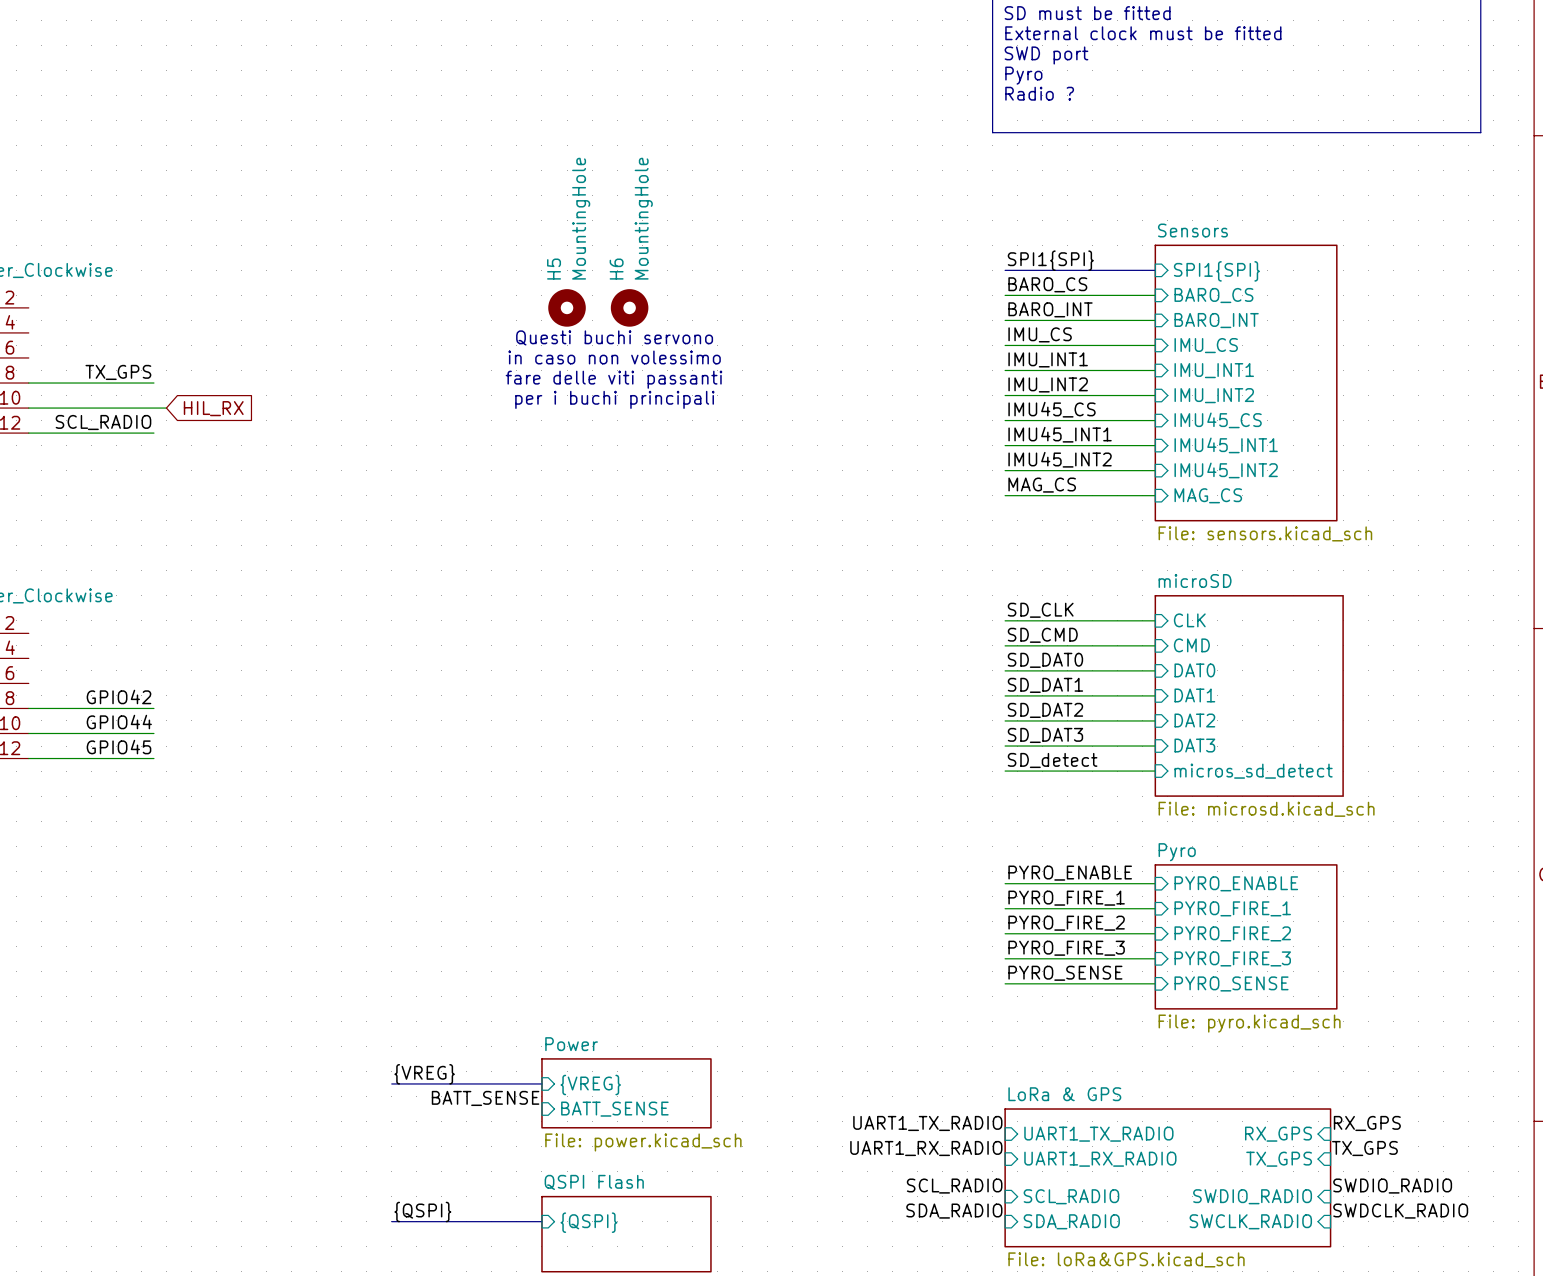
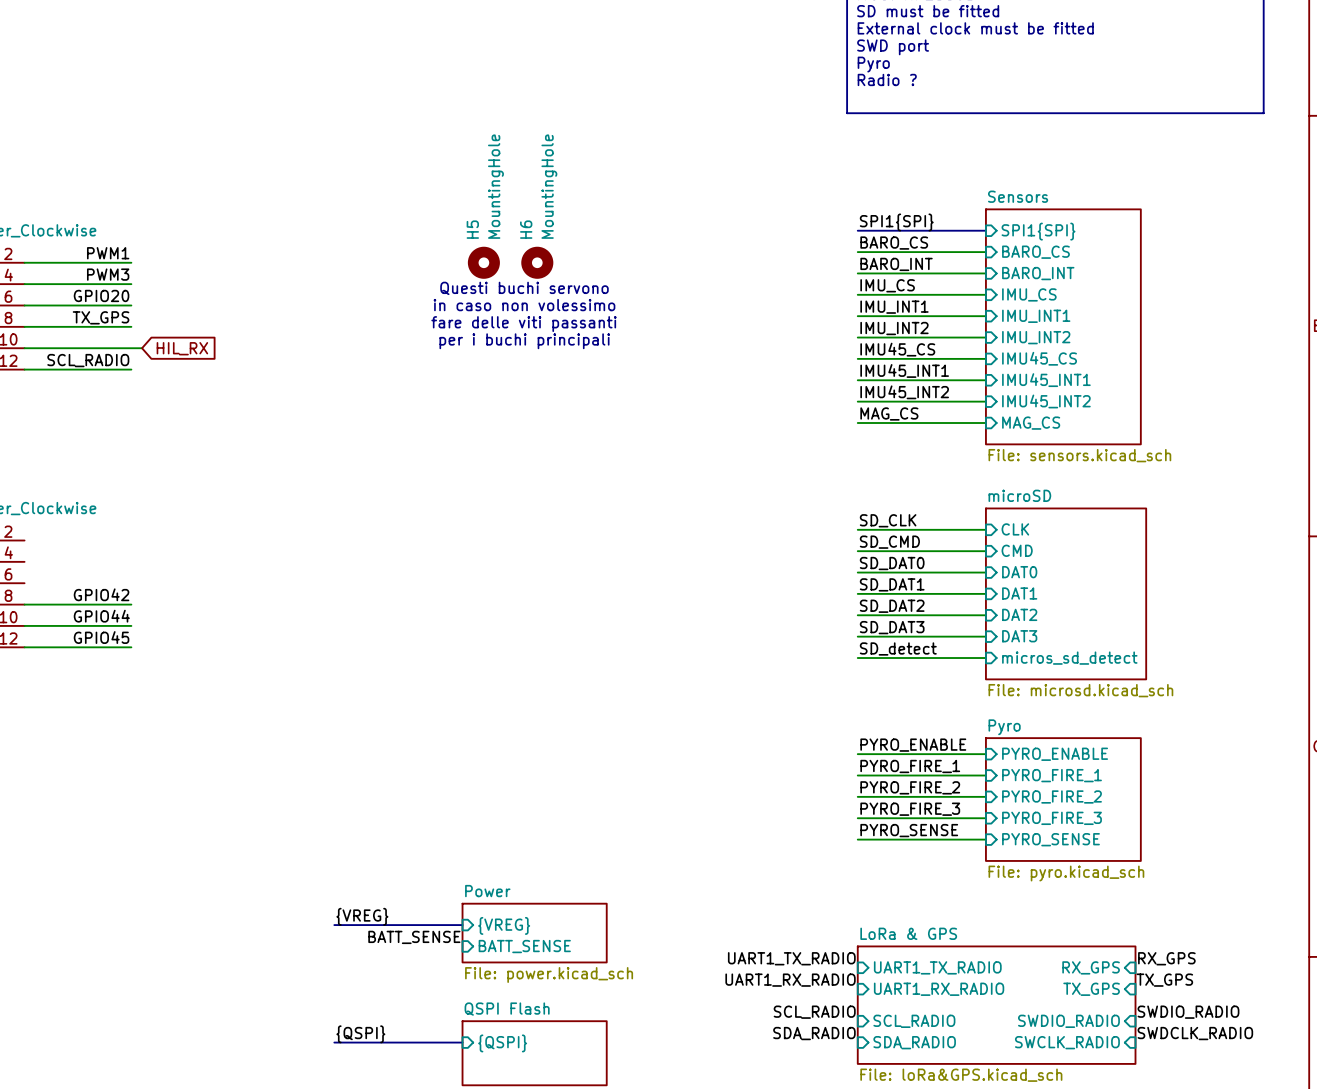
label: none -> PWM1 (108, 253)
wire: none -> (24, 262) (131, 262)
label: none -> PWM3 (108, 274)
wire: none -> (24, 284) (131, 284)
label: none -> GPIO20 (101, 295)
wire: none -> (24, 305) (131, 305)

